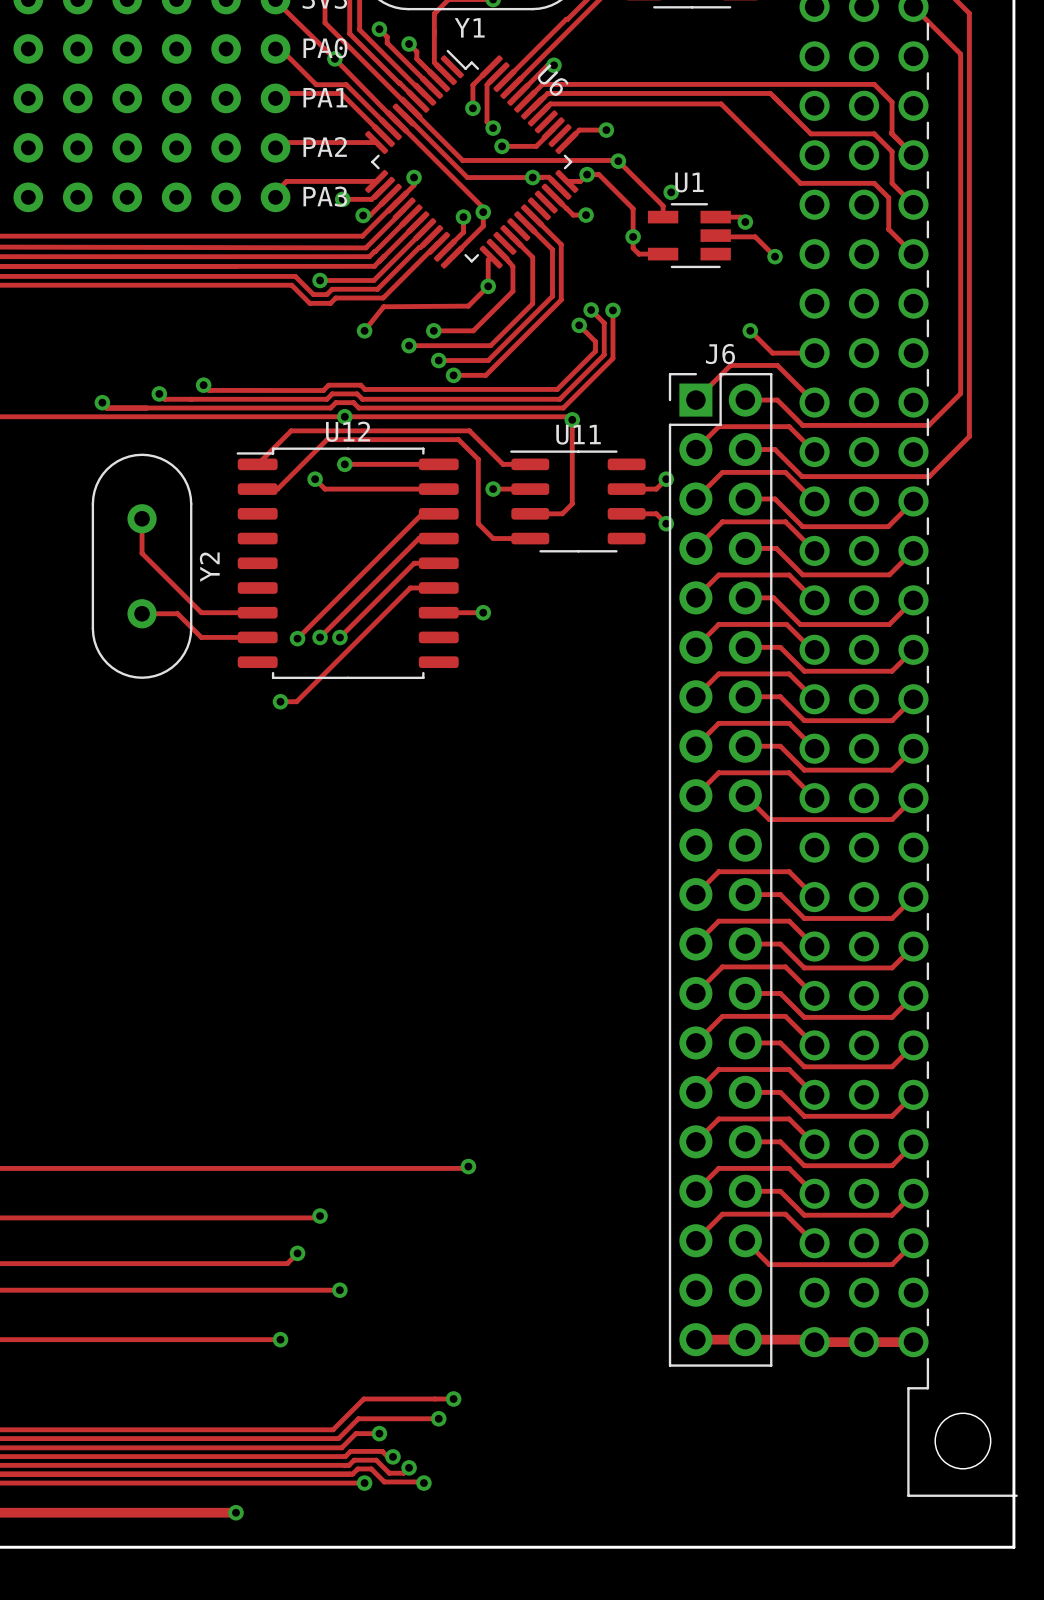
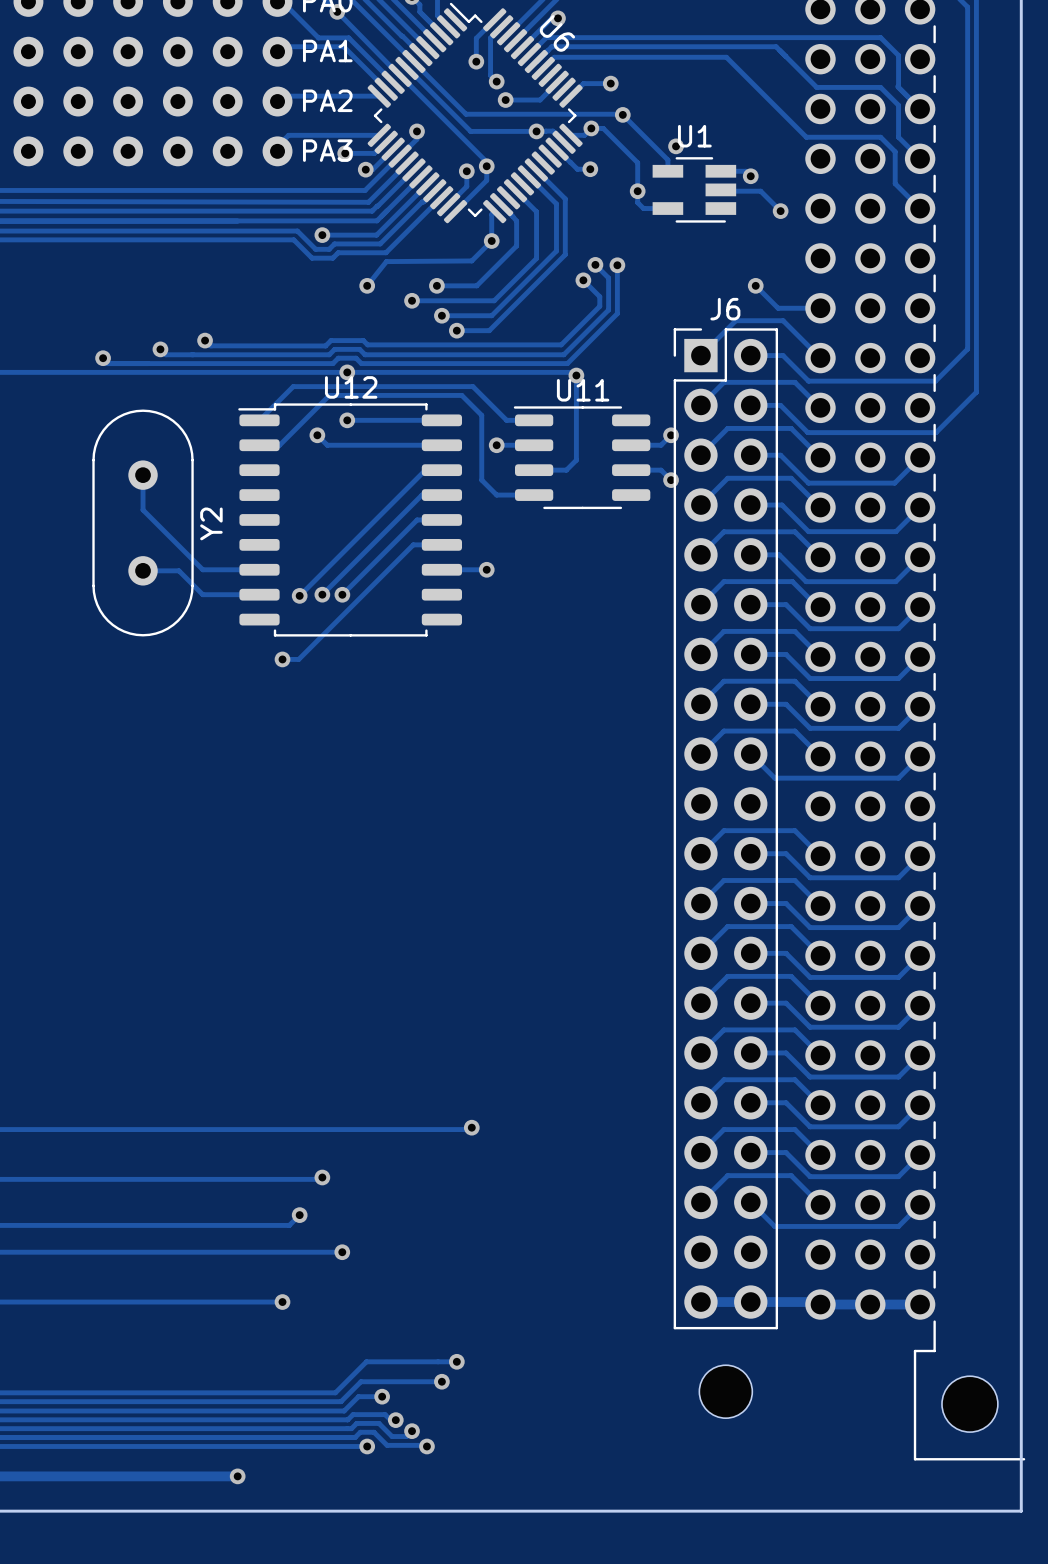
part: none -> (725, 1391)

